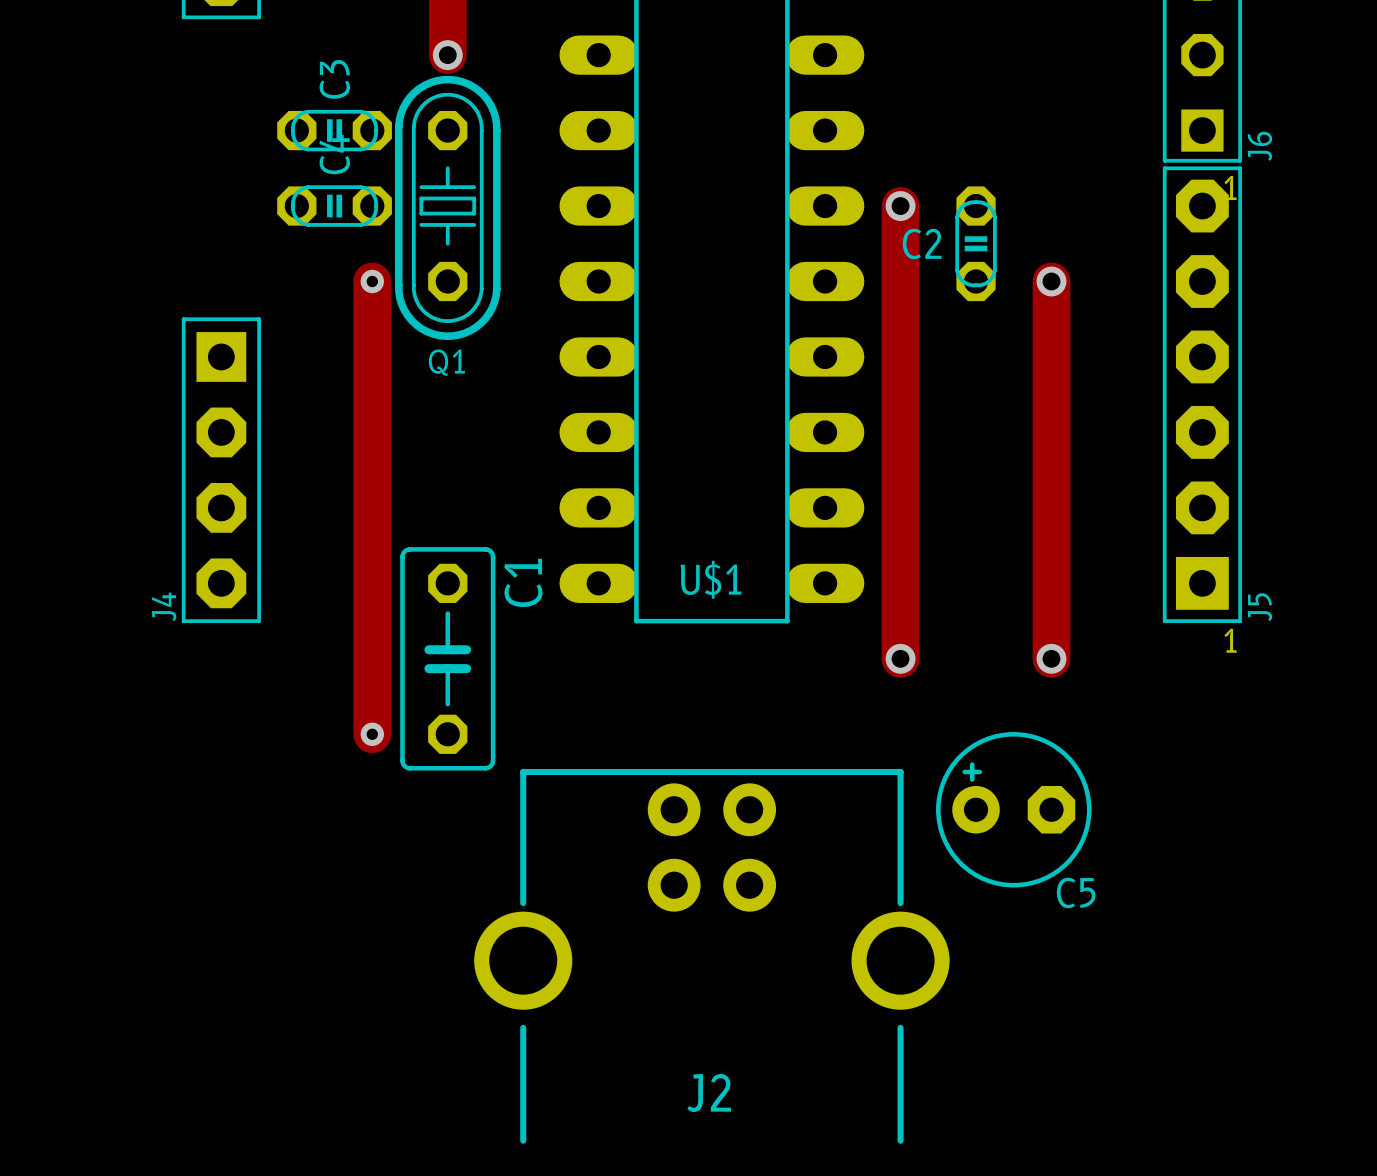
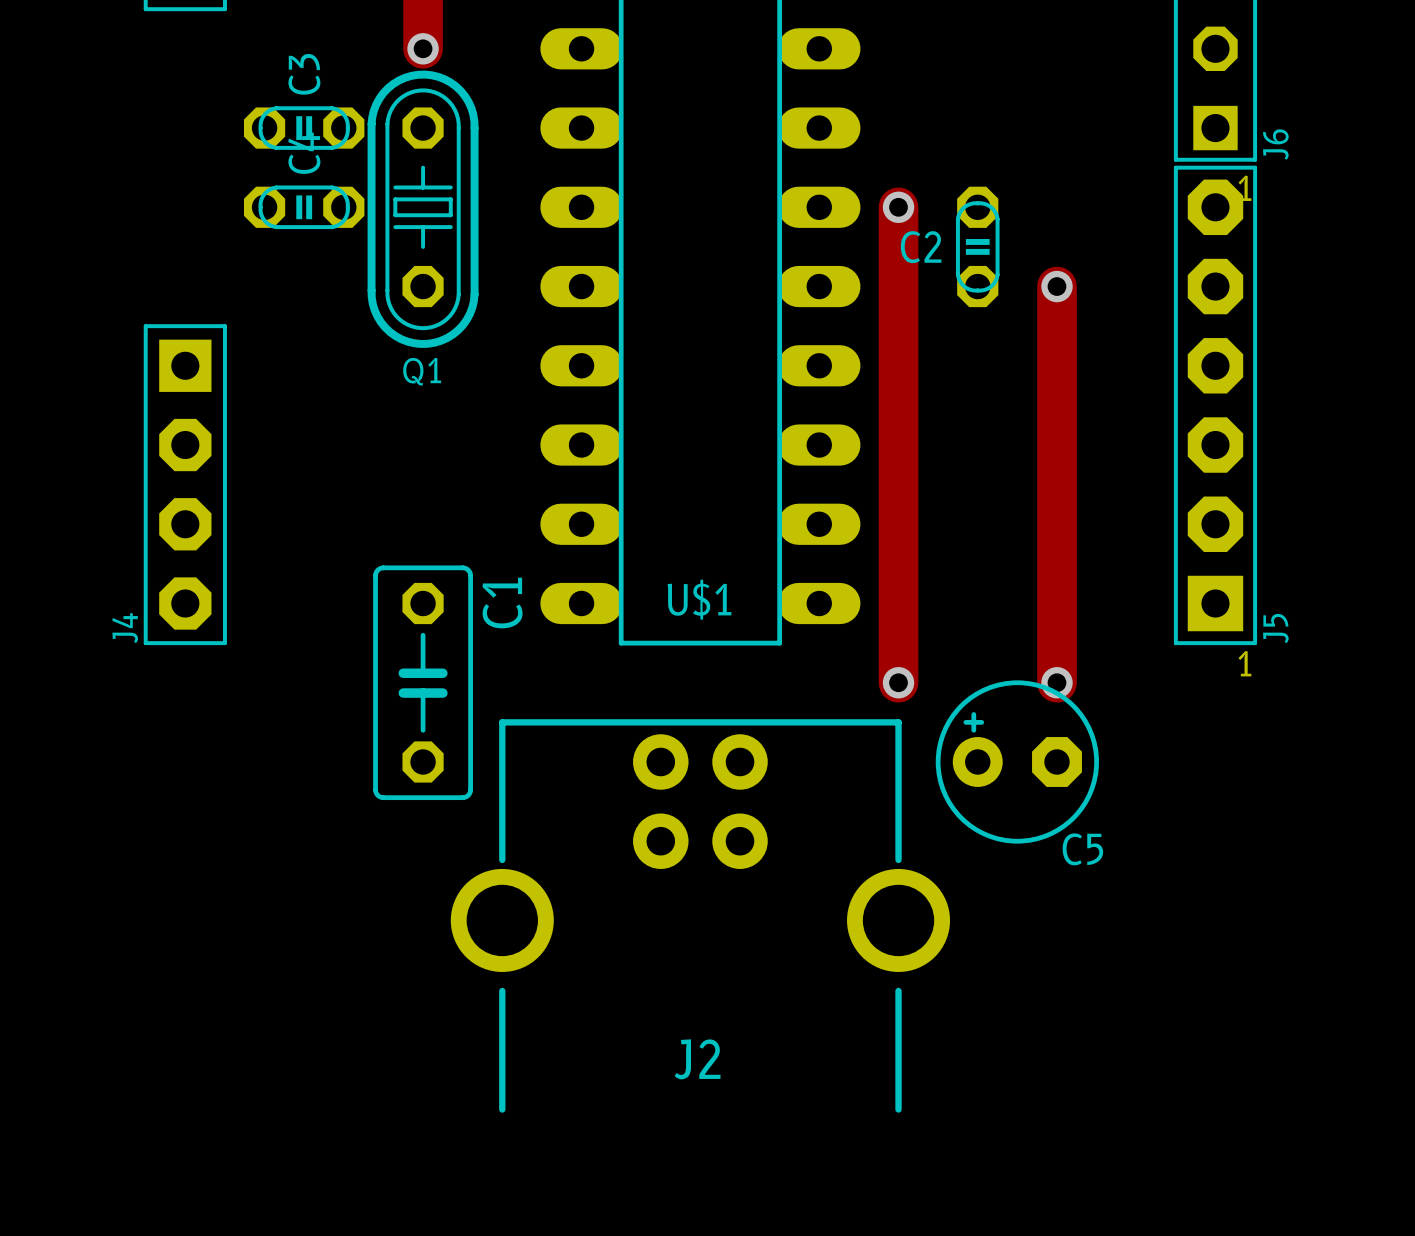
track: (372, 281) (372, 734) -> none
via: (372, 281) -> none
via: (372, 734) -> none
C5 position: (1013, 809) -> (1017, 761)
J2 position: (711, 956) -> (700, 915)

